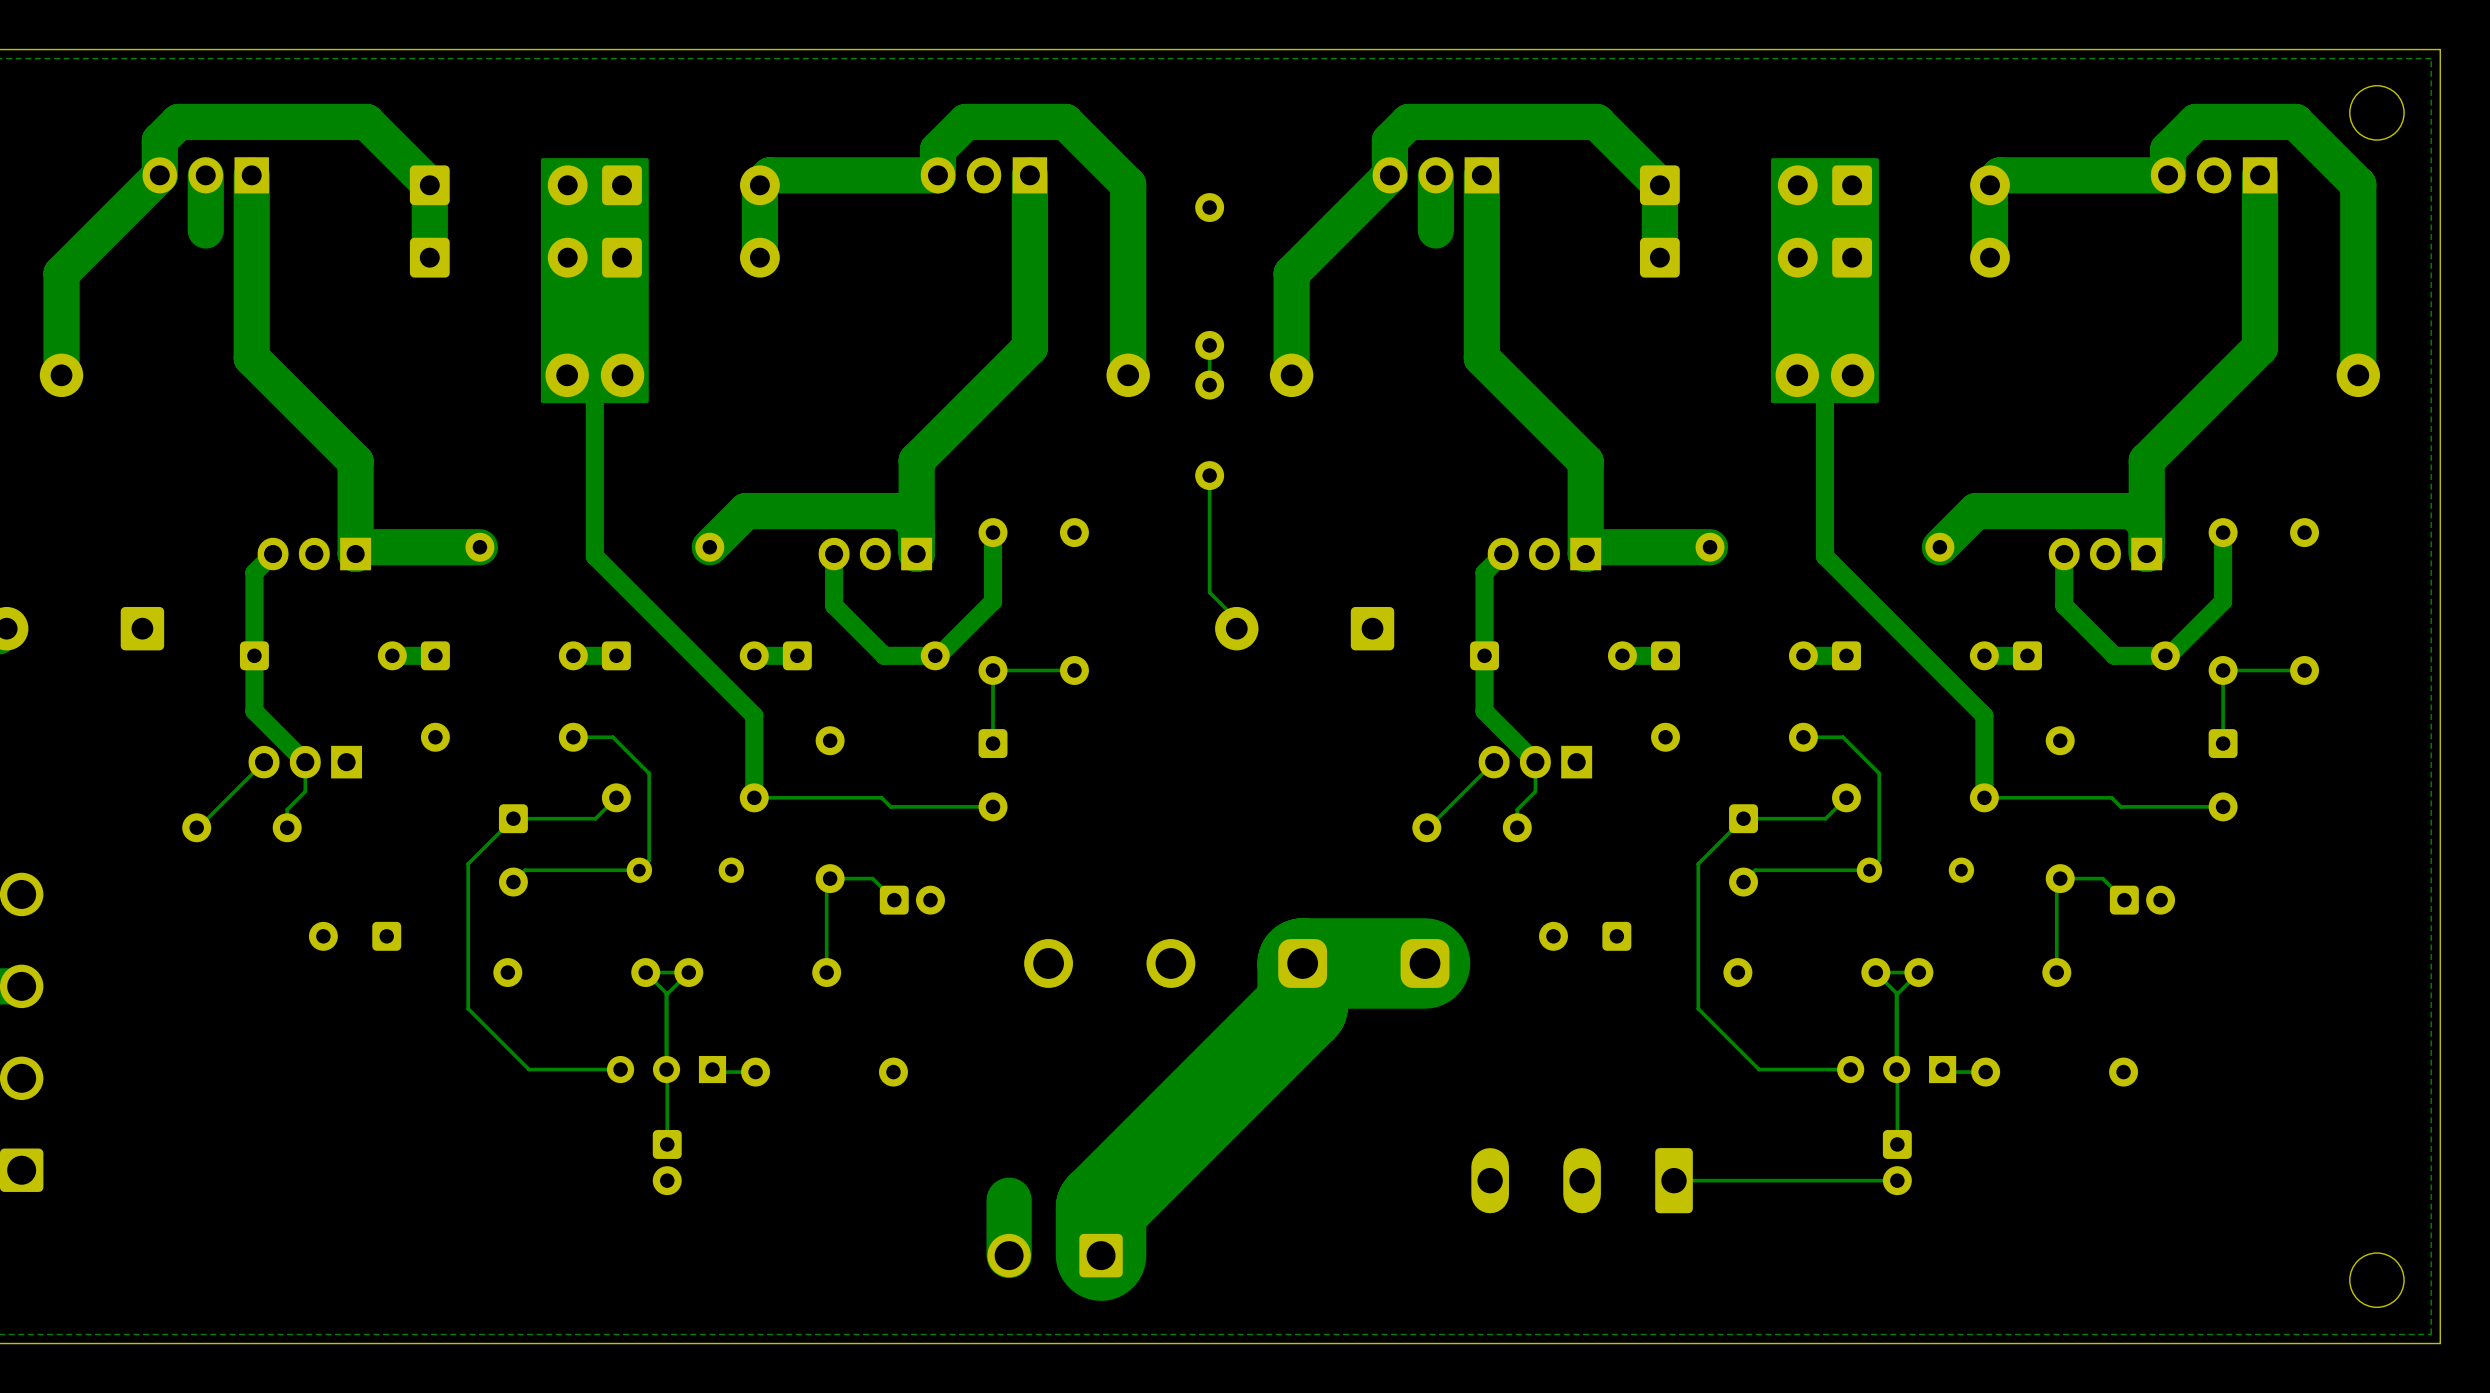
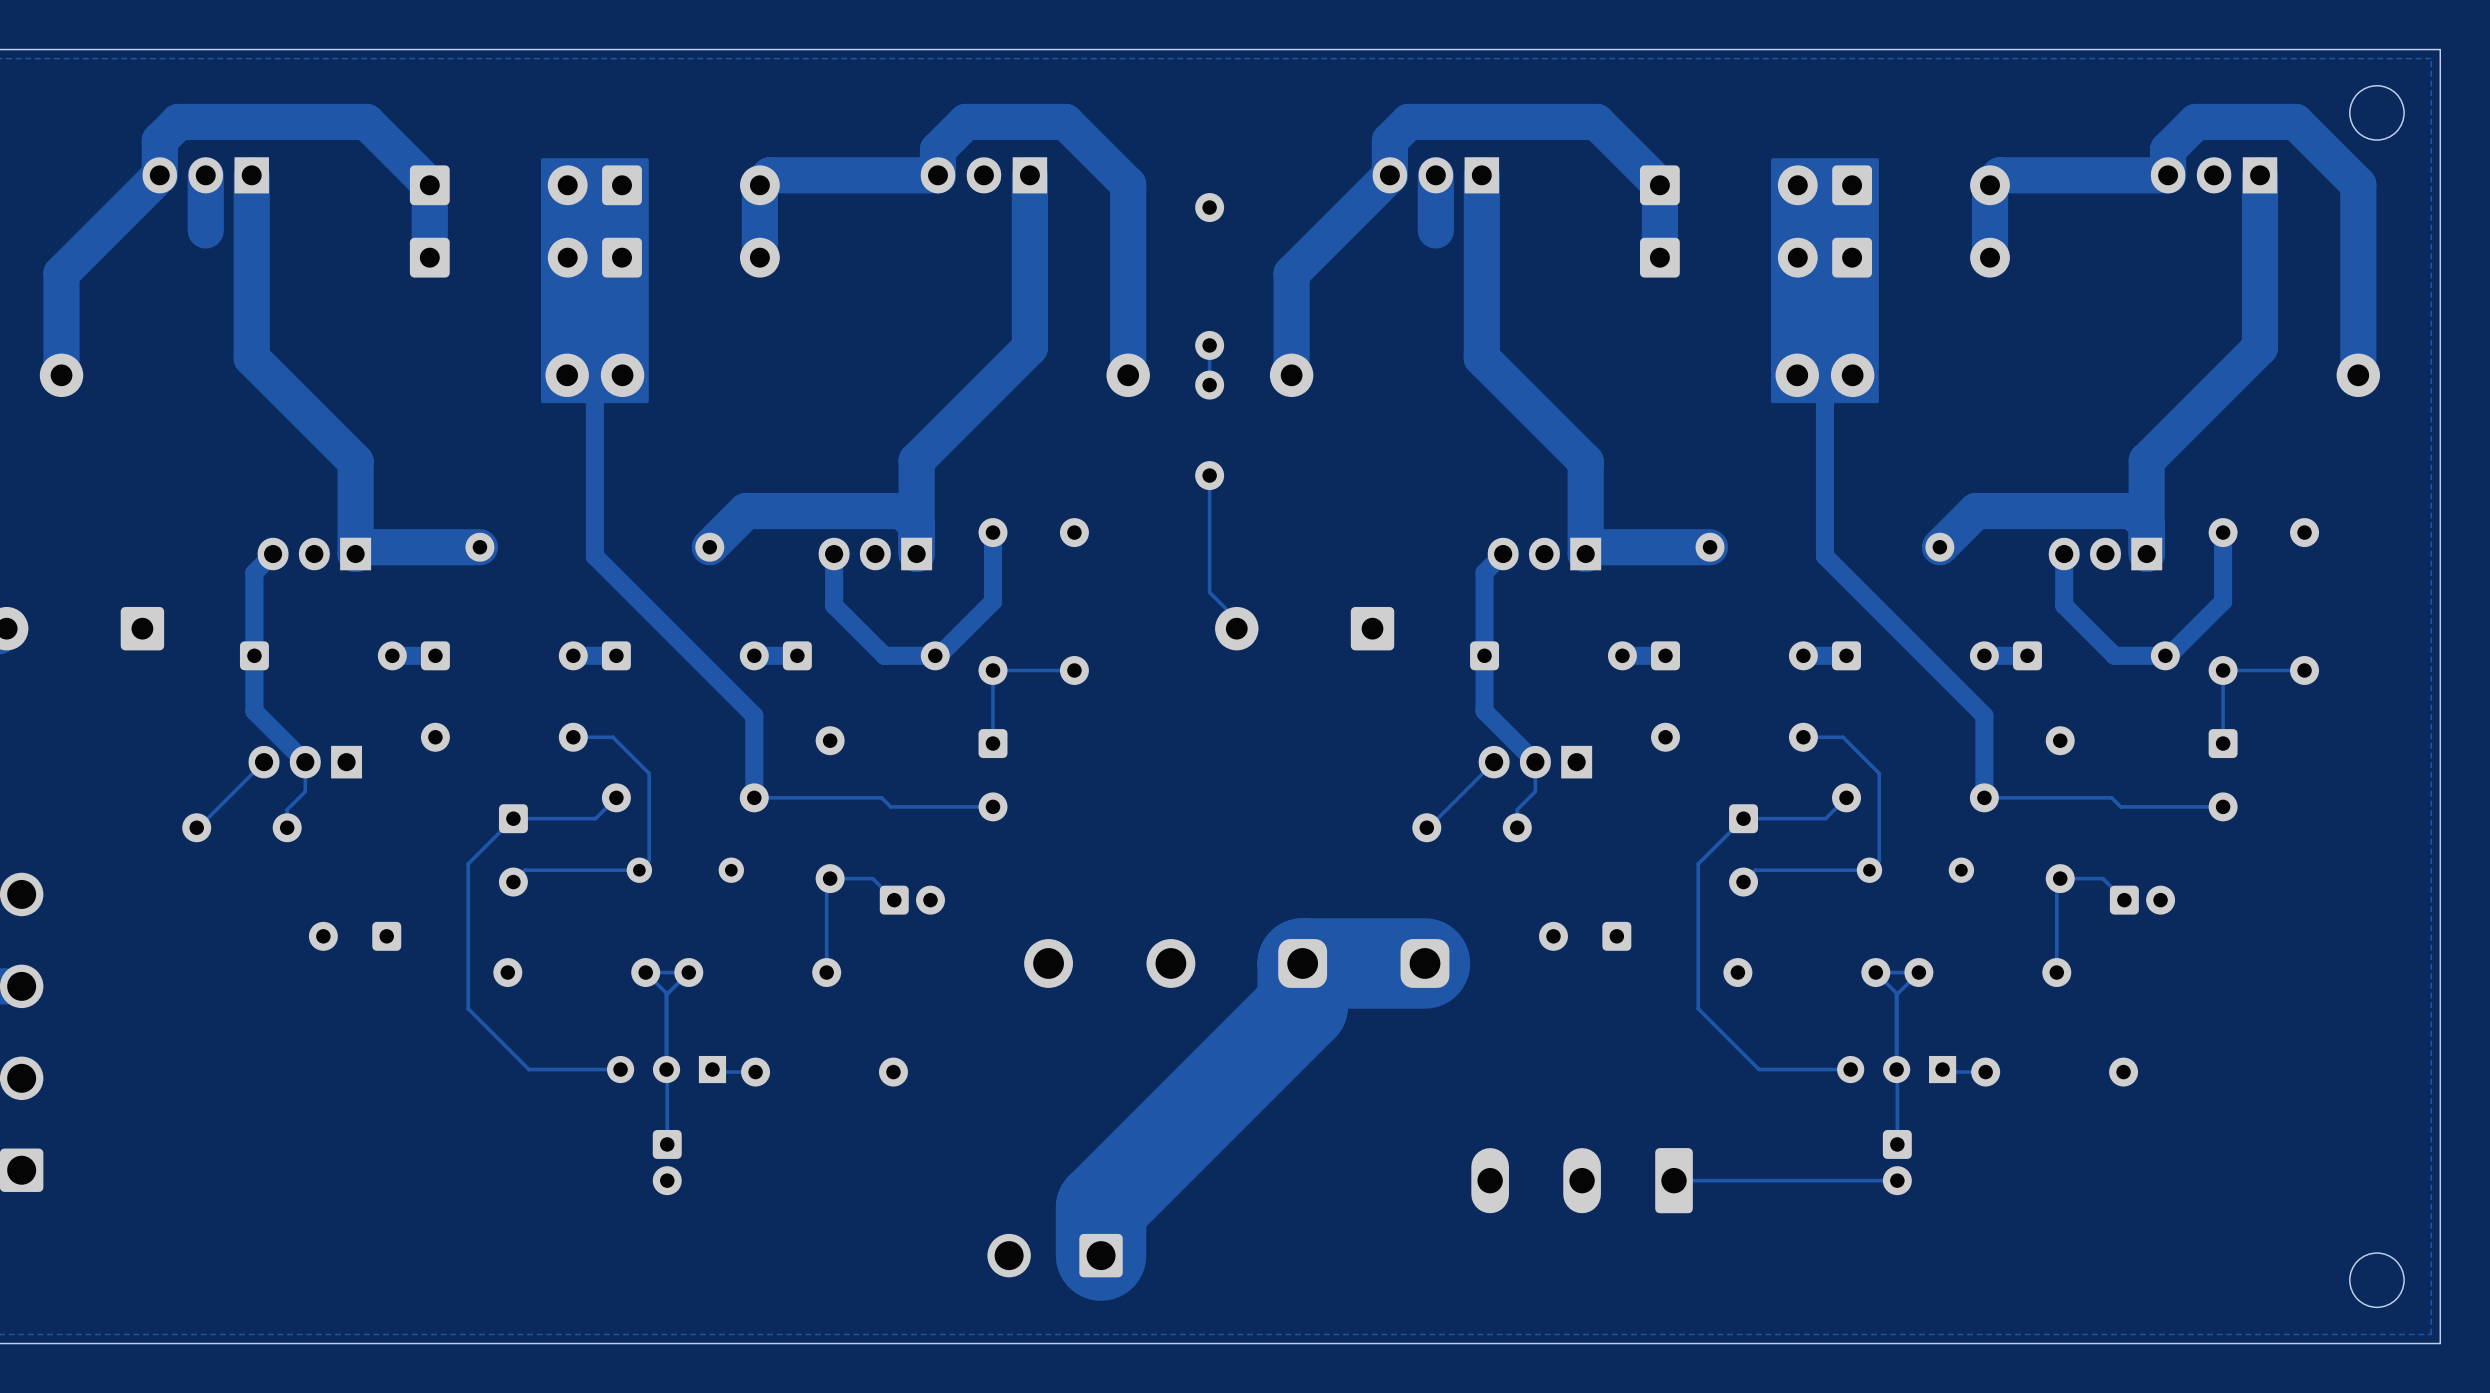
track: (1009, 1200) (1009, 1255) -> none

